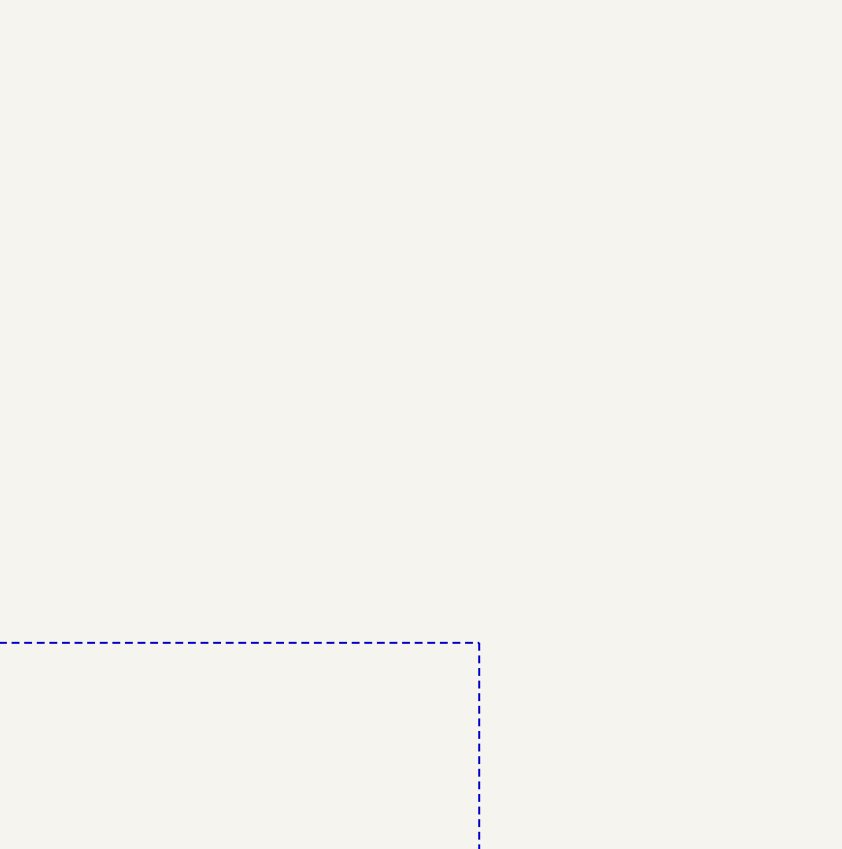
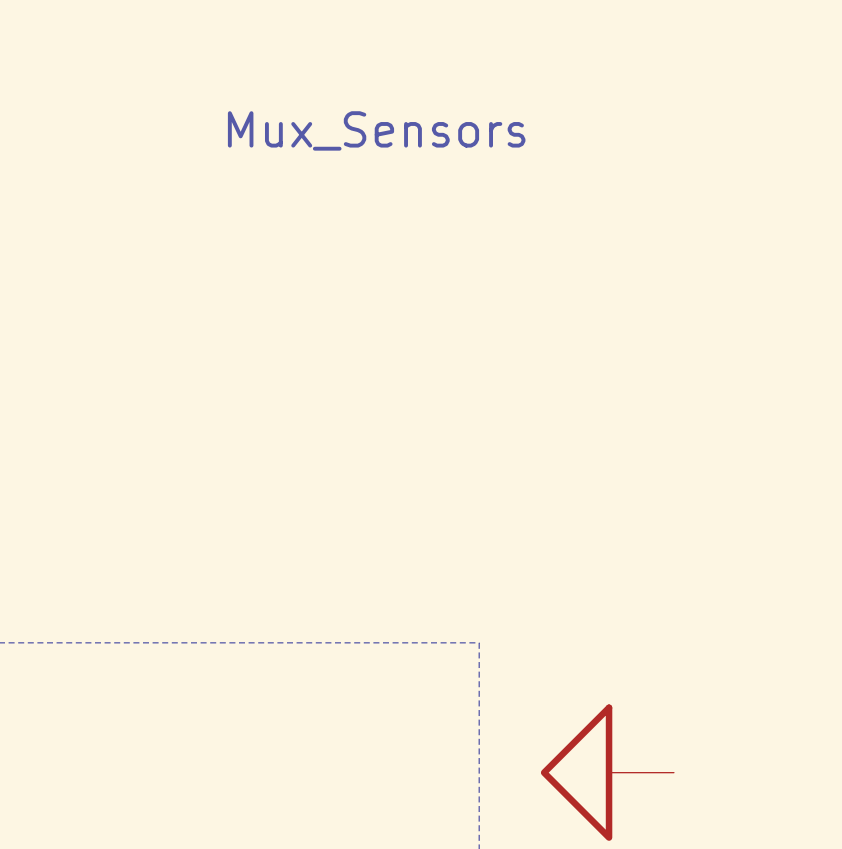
text: none -> Mux_Sensors (376, 130)
power symbol: none -> (607, 772)

